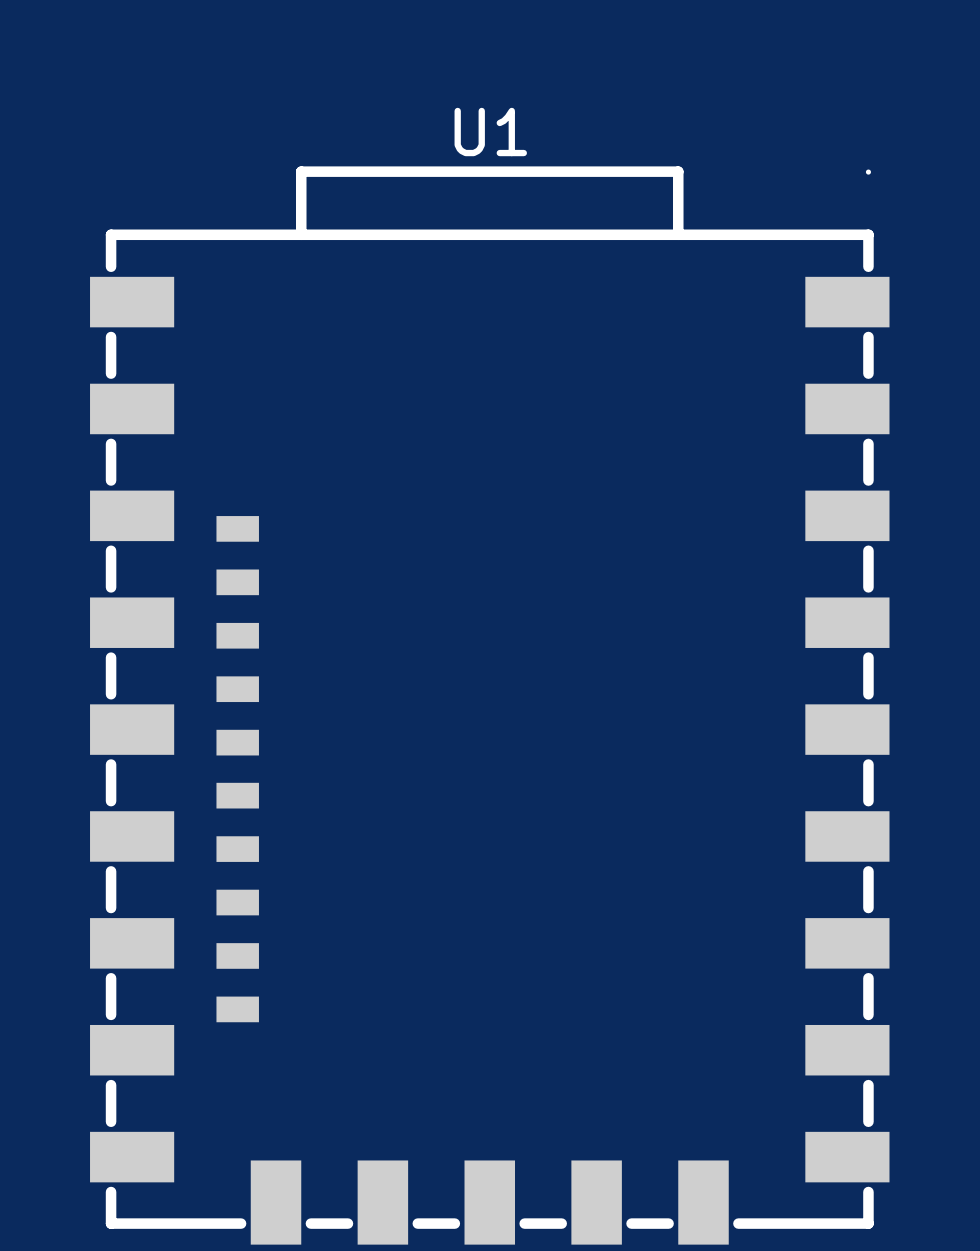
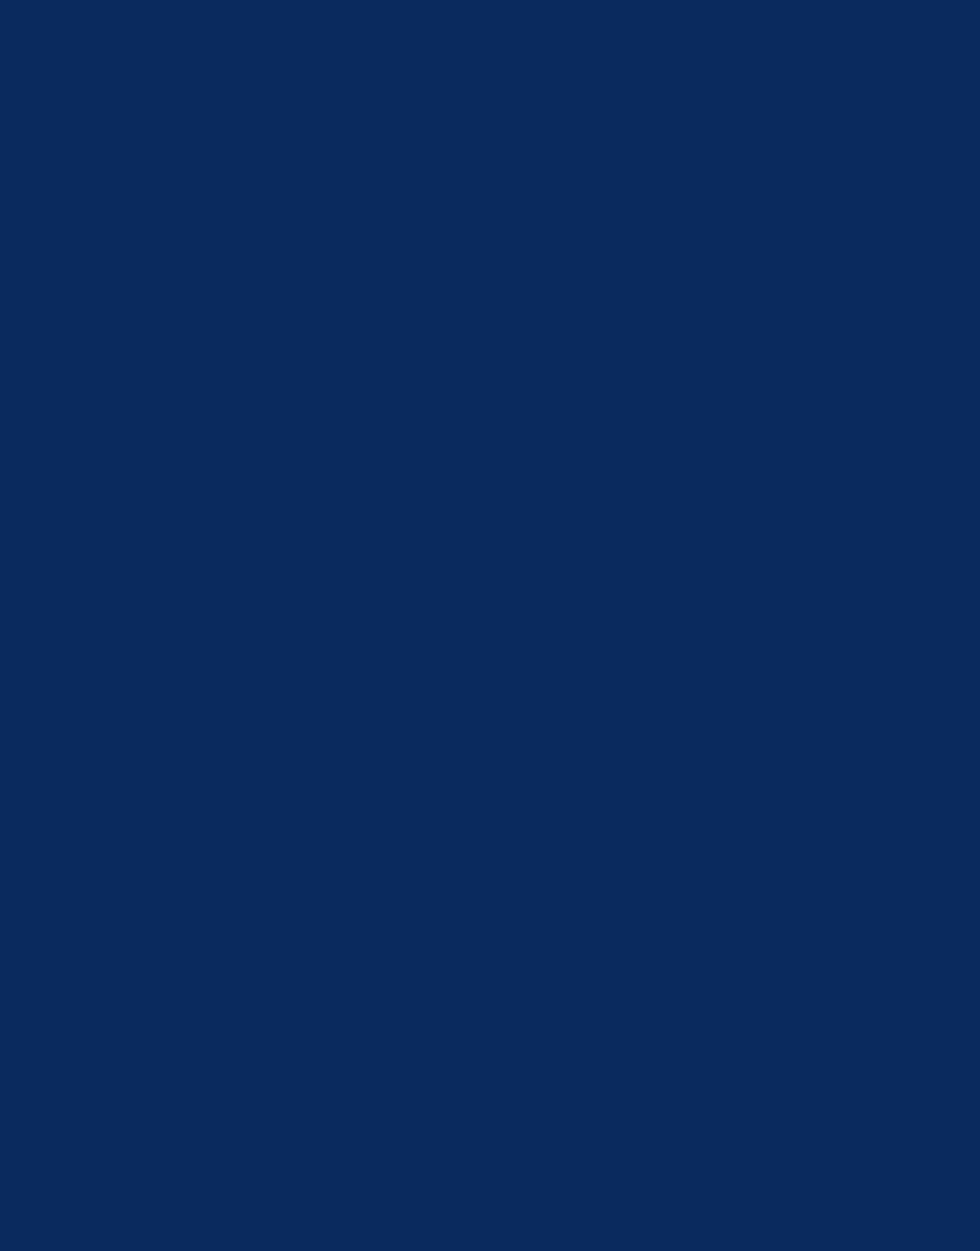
U1: (489, 705) -> none

